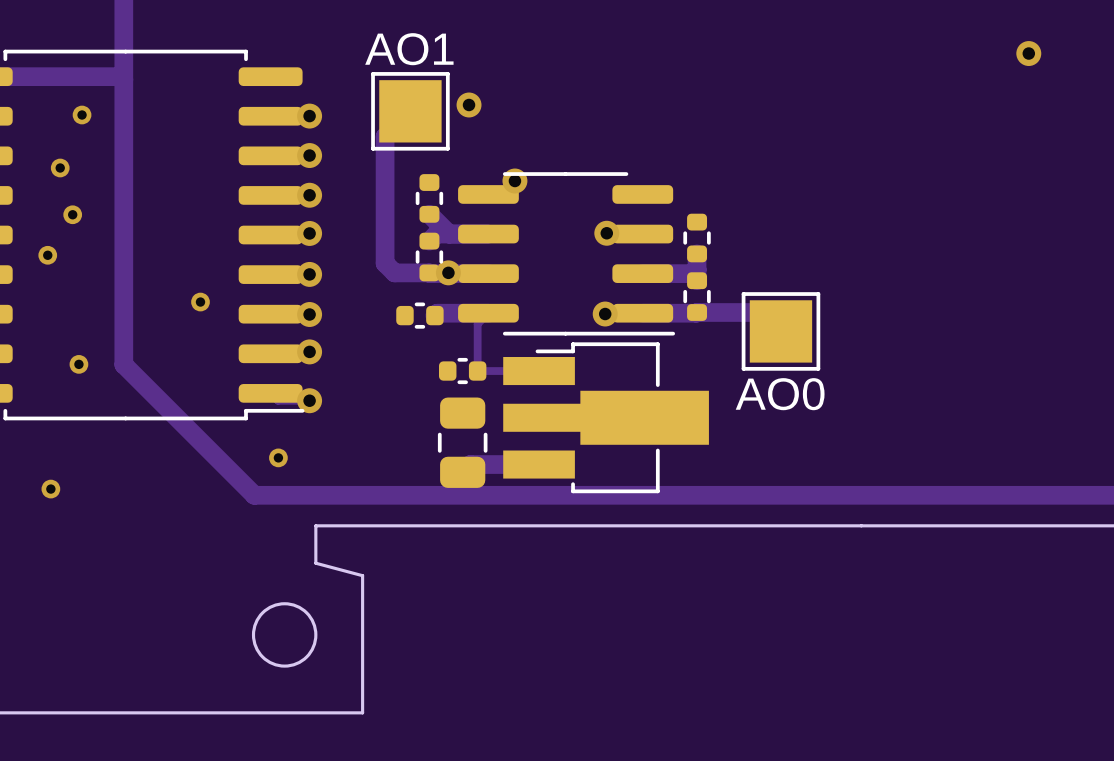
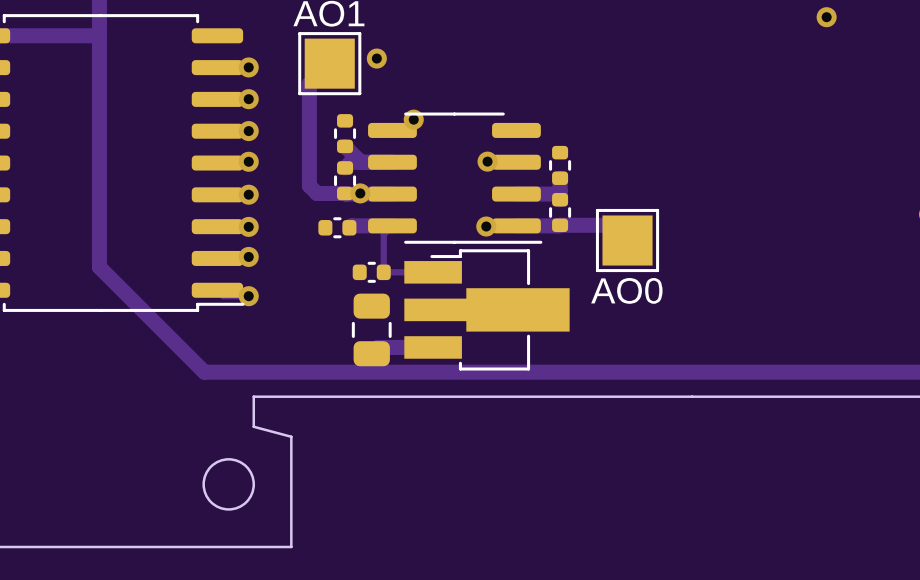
via: (82, 115) -> none
via: (60, 167) -> none
via: (72, 214) -> none
via: (47, 255) -> none
via: (200, 302) -> none
via: (78, 364) -> none
via: (278, 457) -> none
via: (50, 489) -> none

